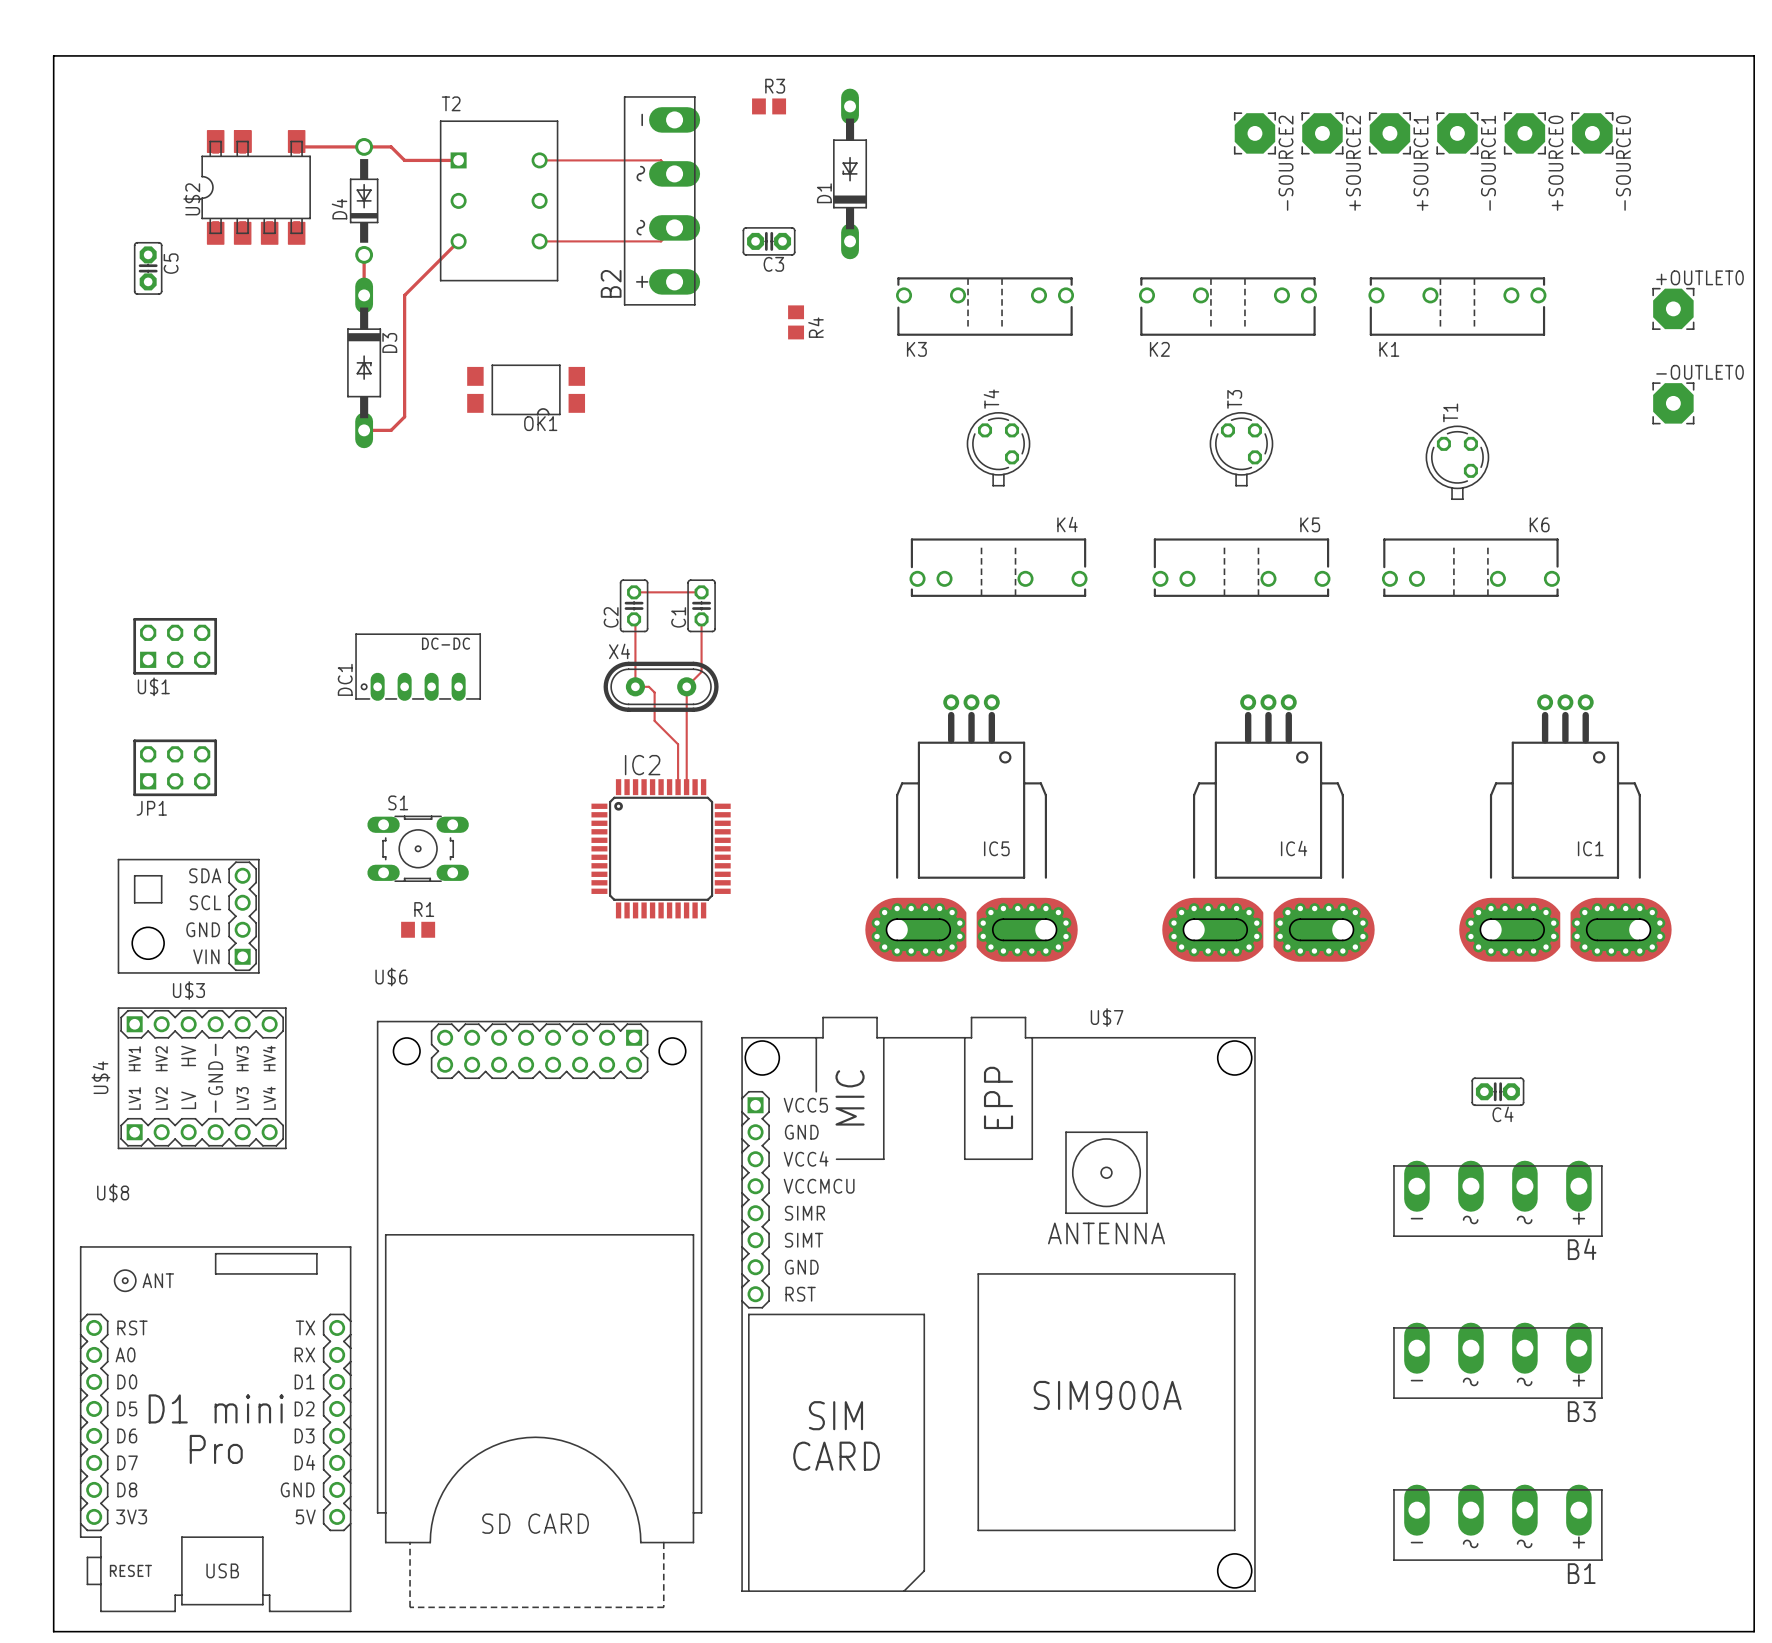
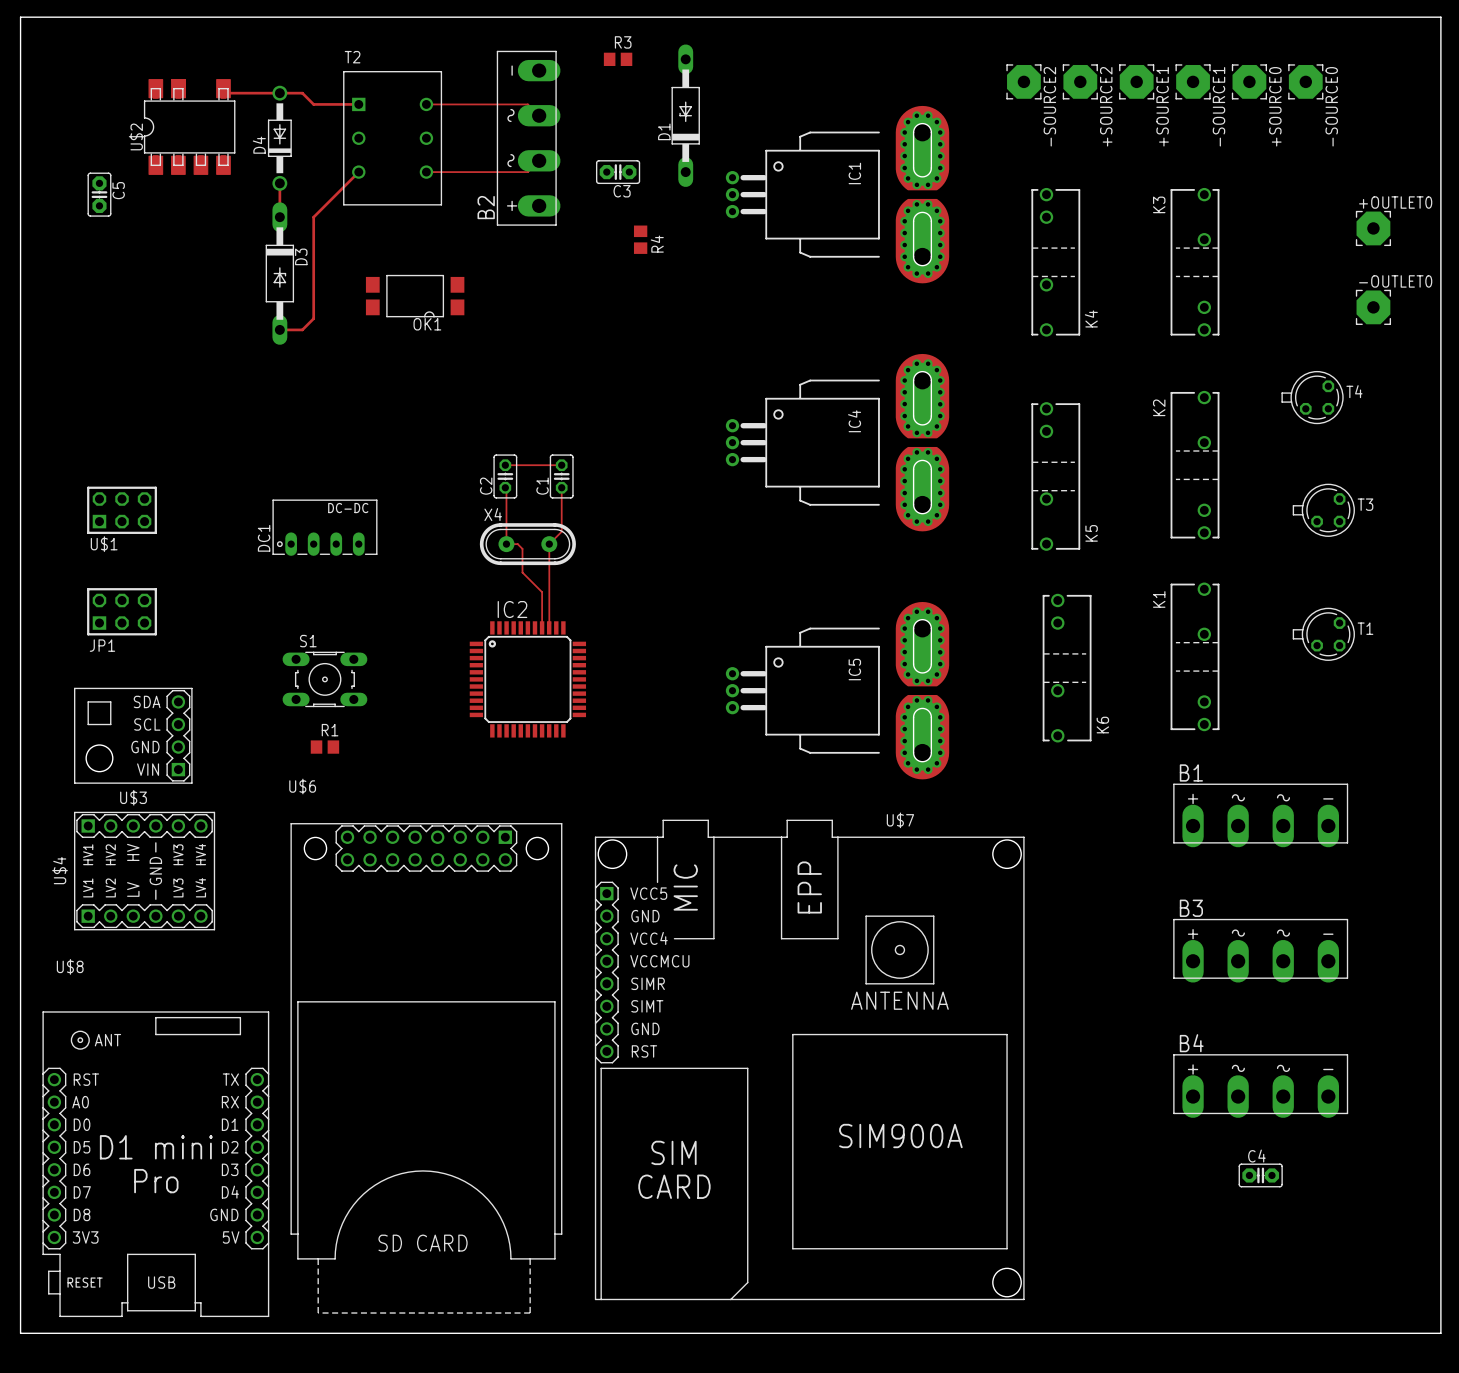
K3 rotation: 0° (985, 306) -> 90° clockwise (1195, 262)
K3 position: (985, 306) -> (1195, 262)
K2 rotation: 0° (1227, 306) -> 90° clockwise (1195, 465)
K2 position: (1227, 306) -> (1195, 465)
K1 rotation: 0° (1457, 306) -> 90° clockwise (1195, 656)
K1 position: (1457, 306) -> (1195, 656)
T4 rotation: 0° (998, 449) -> 90° clockwise (1312, 397)
T4 position: (998, 449) -> (1312, 397)
T3 rotation: 0° (1241, 449) -> 90° clockwise (1323, 510)
T3 position: (1241, 449) -> (1323, 510)
T1 rotation: 0° (1457, 462) -> 90° clockwise (1323, 634)
T1 position: (1457, 462) -> (1323, 634)
K4 rotation: 0° (998, 567) -> 90° clockwise (1055, 262)
K4 position: (998, 567) -> (1055, 262)
K5 rotation: 0° (1241, 567) -> 90° clockwise (1055, 476)
K6 rotation: 0° (1470, 567) -> 90° clockwise (1067, 668)
K6 position: (1470, 567) -> (1067, 668)
IC5 rotation: 0° (971, 828) -> 90° counterclockwise (837, 690)
IC4 rotation: 0° (1268, 828) -> 90° counterclockwise (837, 442)
IC4 position: (1268, 828) -> (837, 442)
IC1 rotation: 0° (1565, 828) -> 90° counterclockwise (837, 194)
IC1 position: (1565, 828) -> (837, 194)
C4 position: (1497, 1091) -> (1260, 1175)
C4 name position: C4 (1503, 1114) -> C4 (1256, 1156)
B4 rotation: 0° (1497, 1198) -> 180° (1260, 1086)
B4 position: (1497, 1198) -> (1260, 1086)
B3 rotation: 0° (1497, 1360) -> 180° (1260, 950)
B3 position: (1497, 1360) -> (1260, 950)
B1 rotation: 0° (1497, 1522) -> 180° (1260, 815)
B1 position: (1497, 1522) -> (1260, 815)

